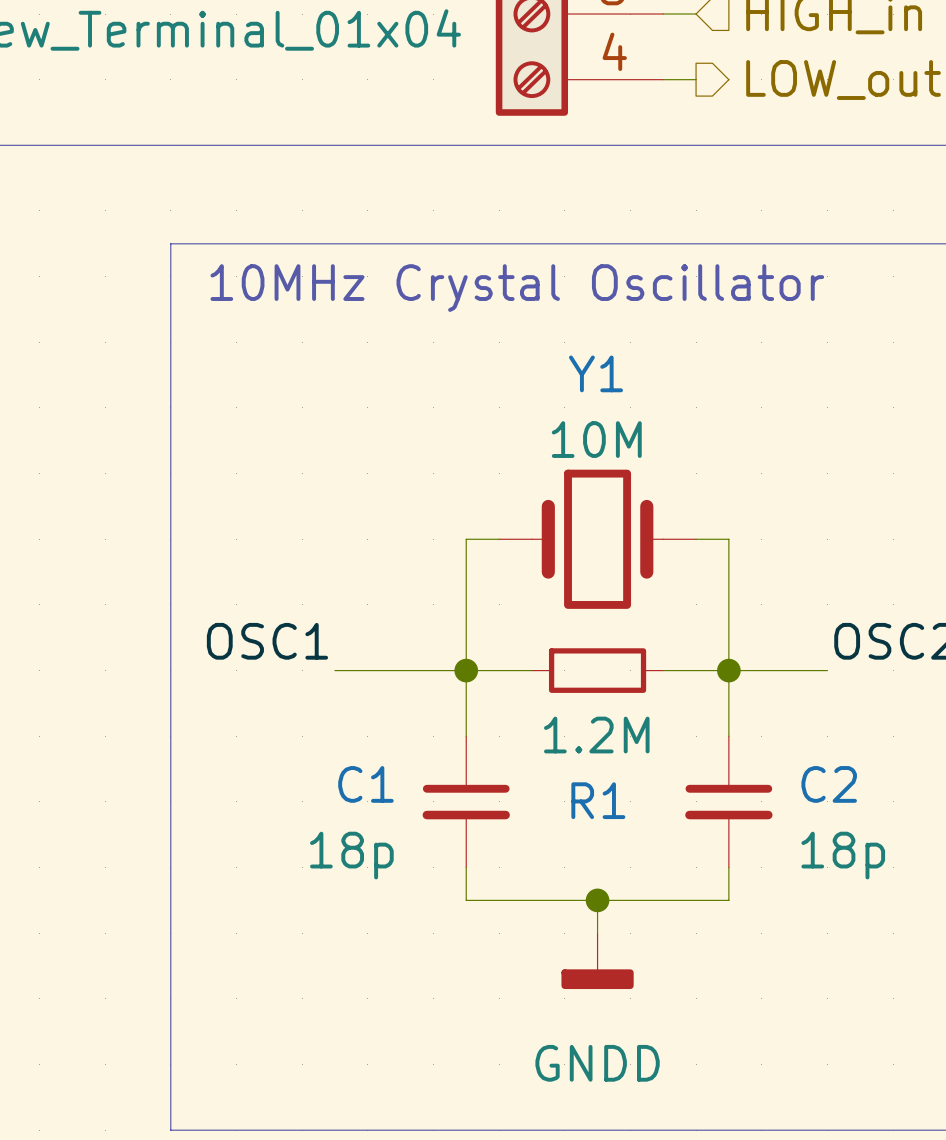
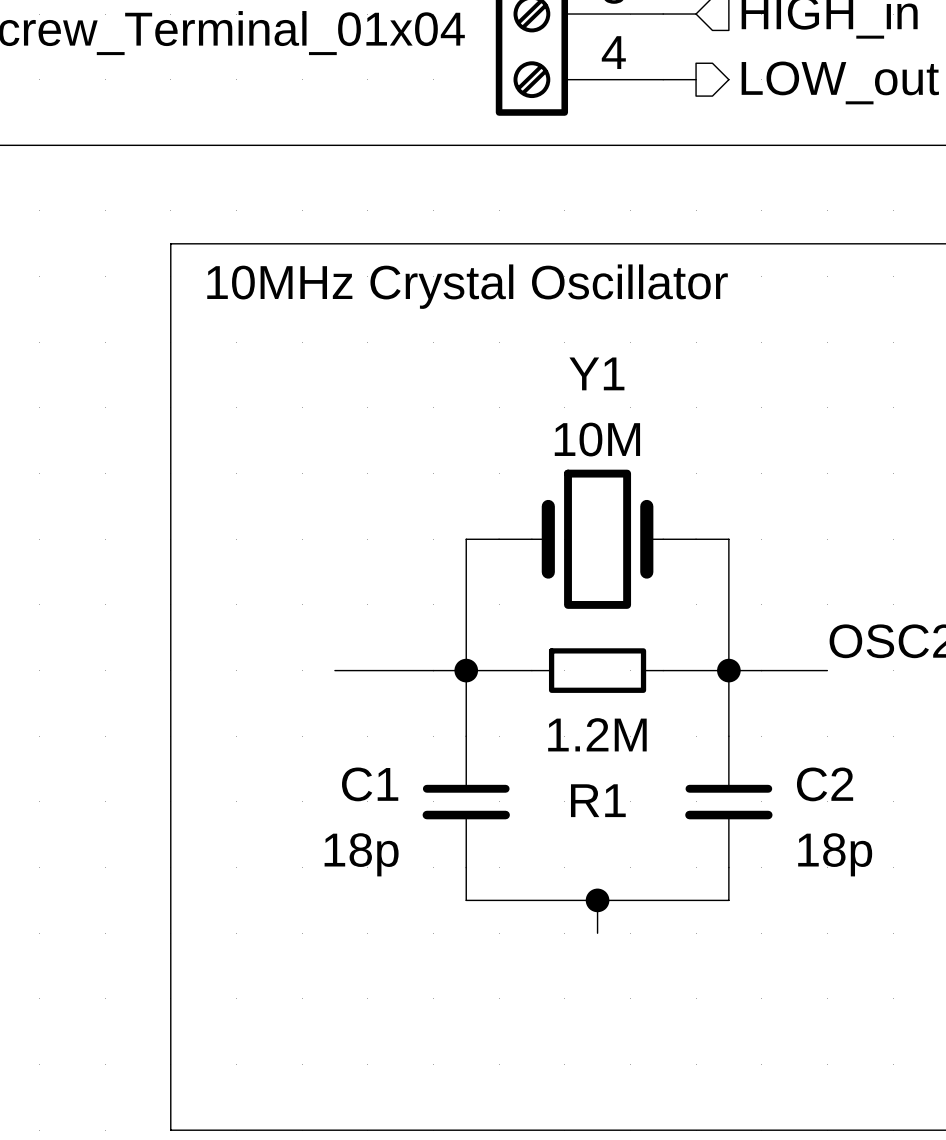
label: OSC1 (267, 641) -> none
power symbol: GNDD (597, 961) -> none

